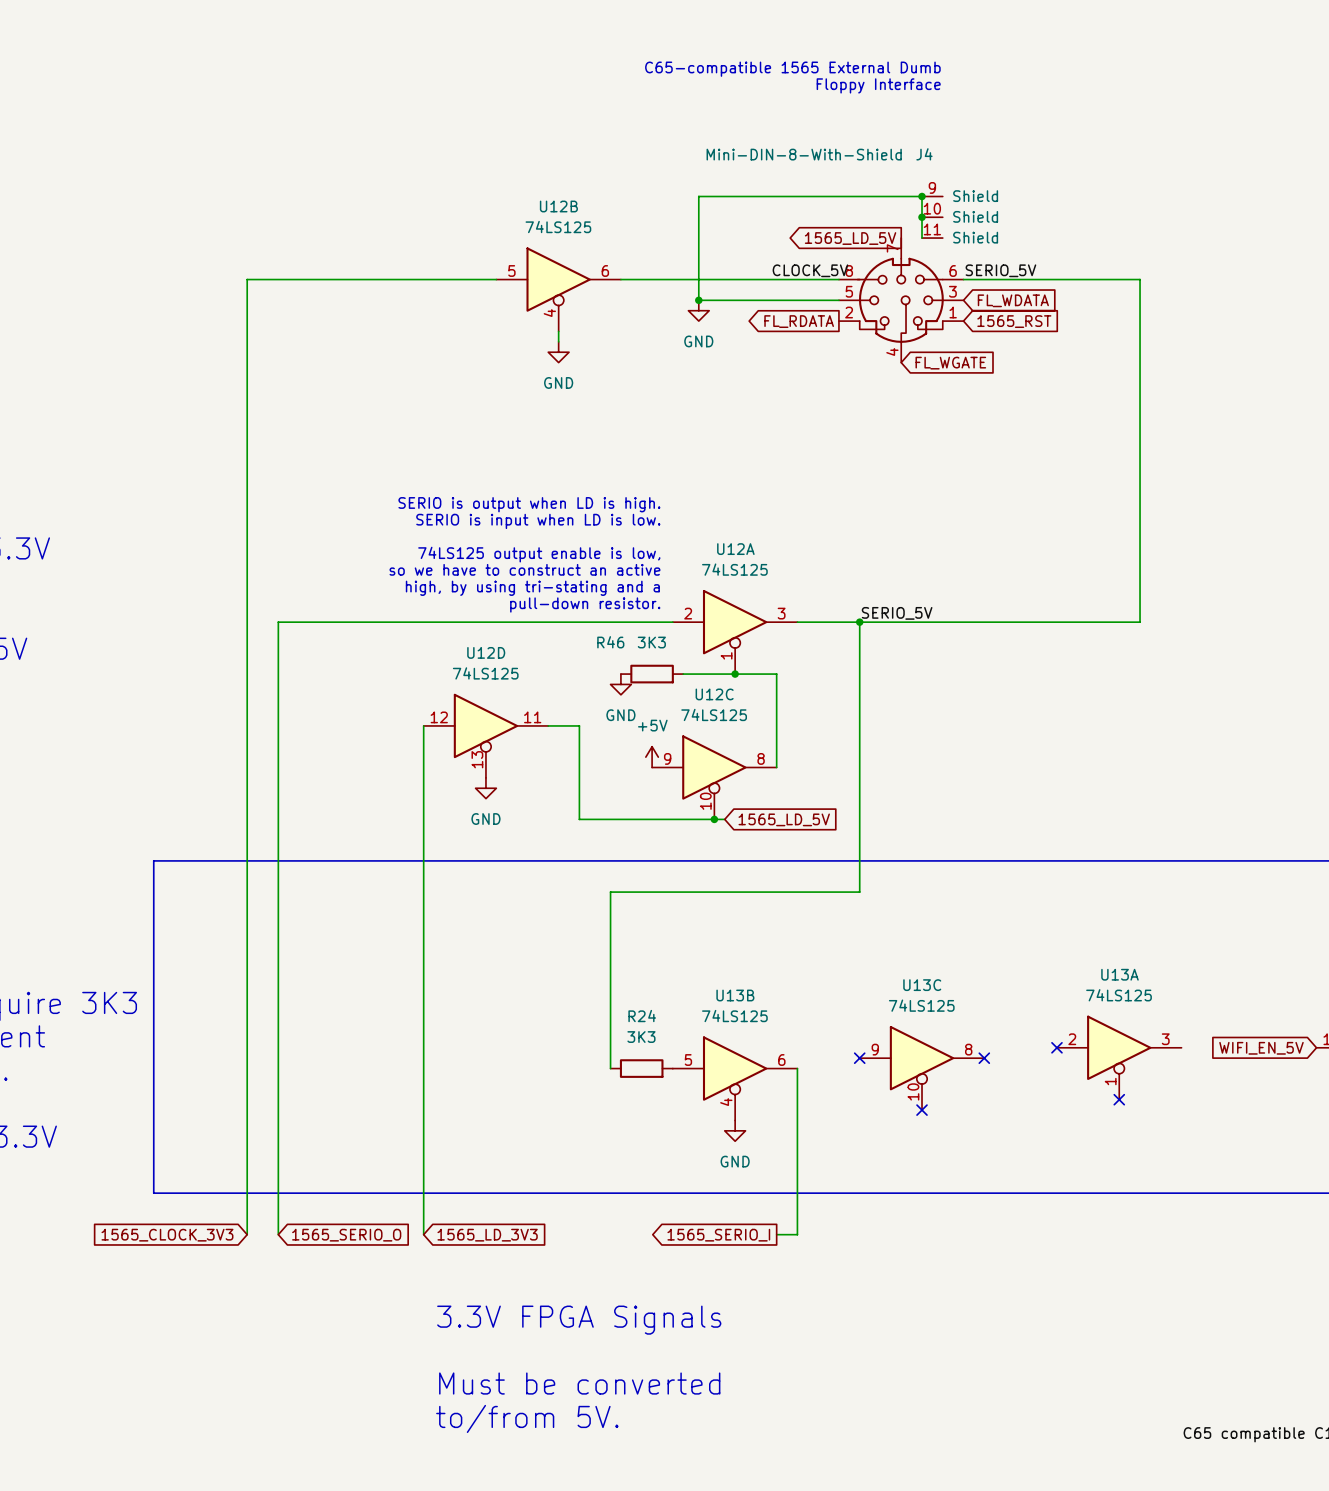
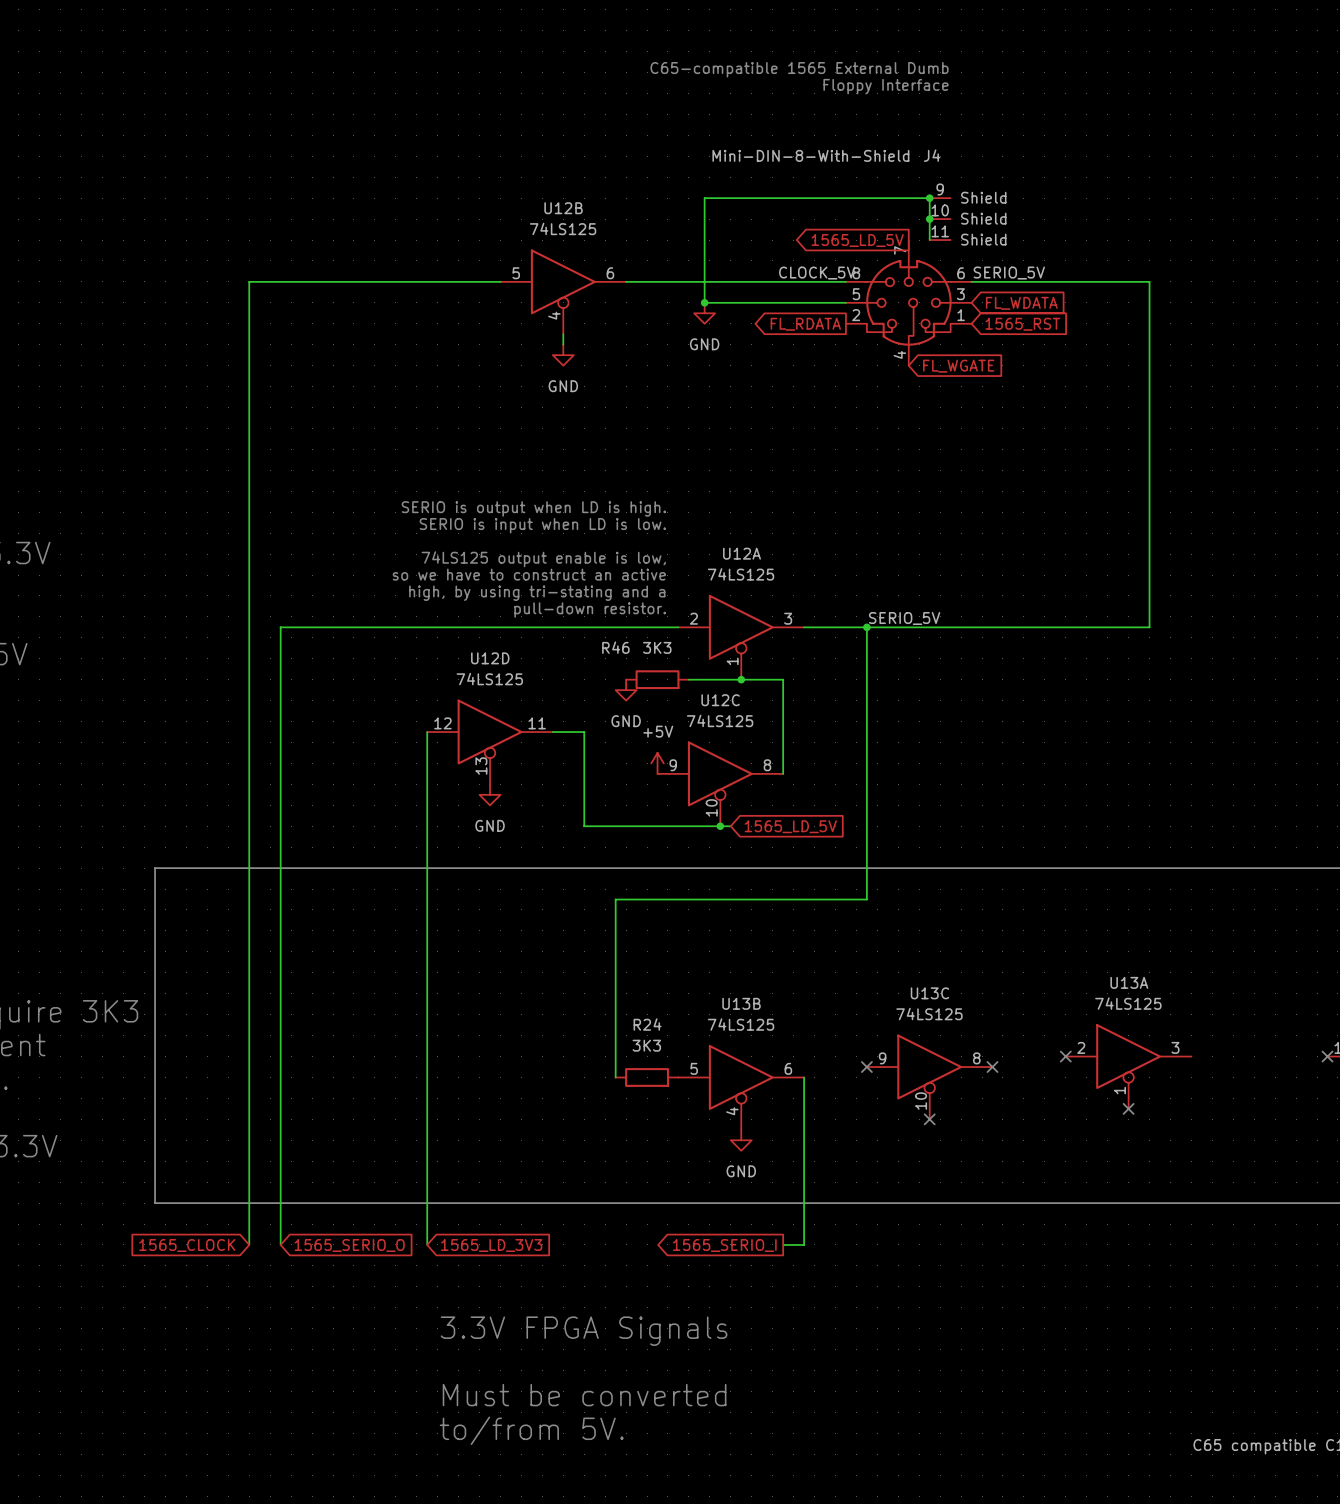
no-connect mark: none -> (1327, 1056)
global label: WIFI_EN_5V (1261, 1048) -> none
global label: 1565_CLOCK_3V3 (167, 1235) -> 1565_CLOCK (187, 1245)

